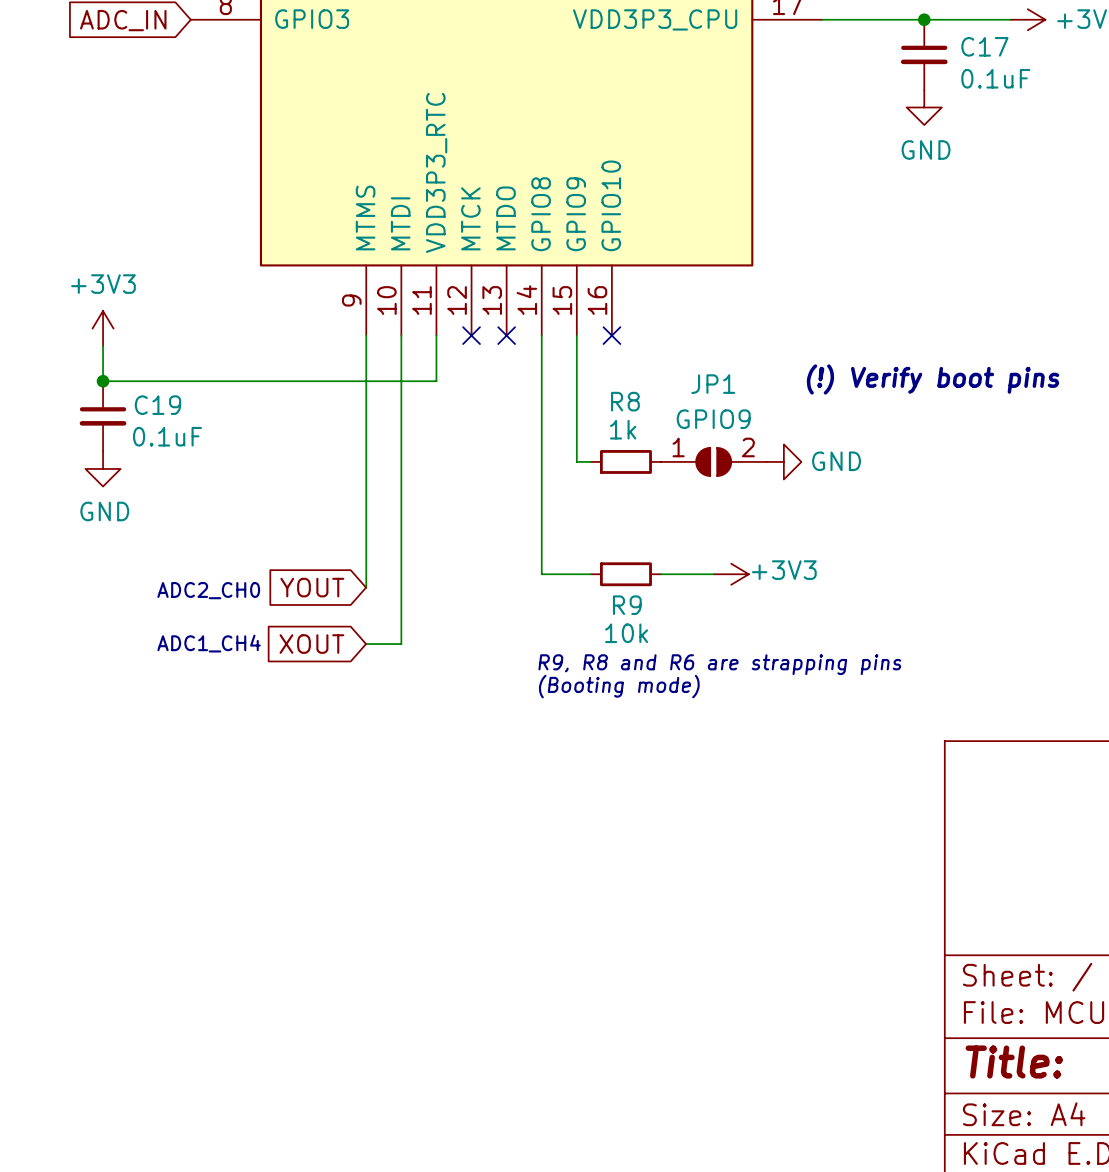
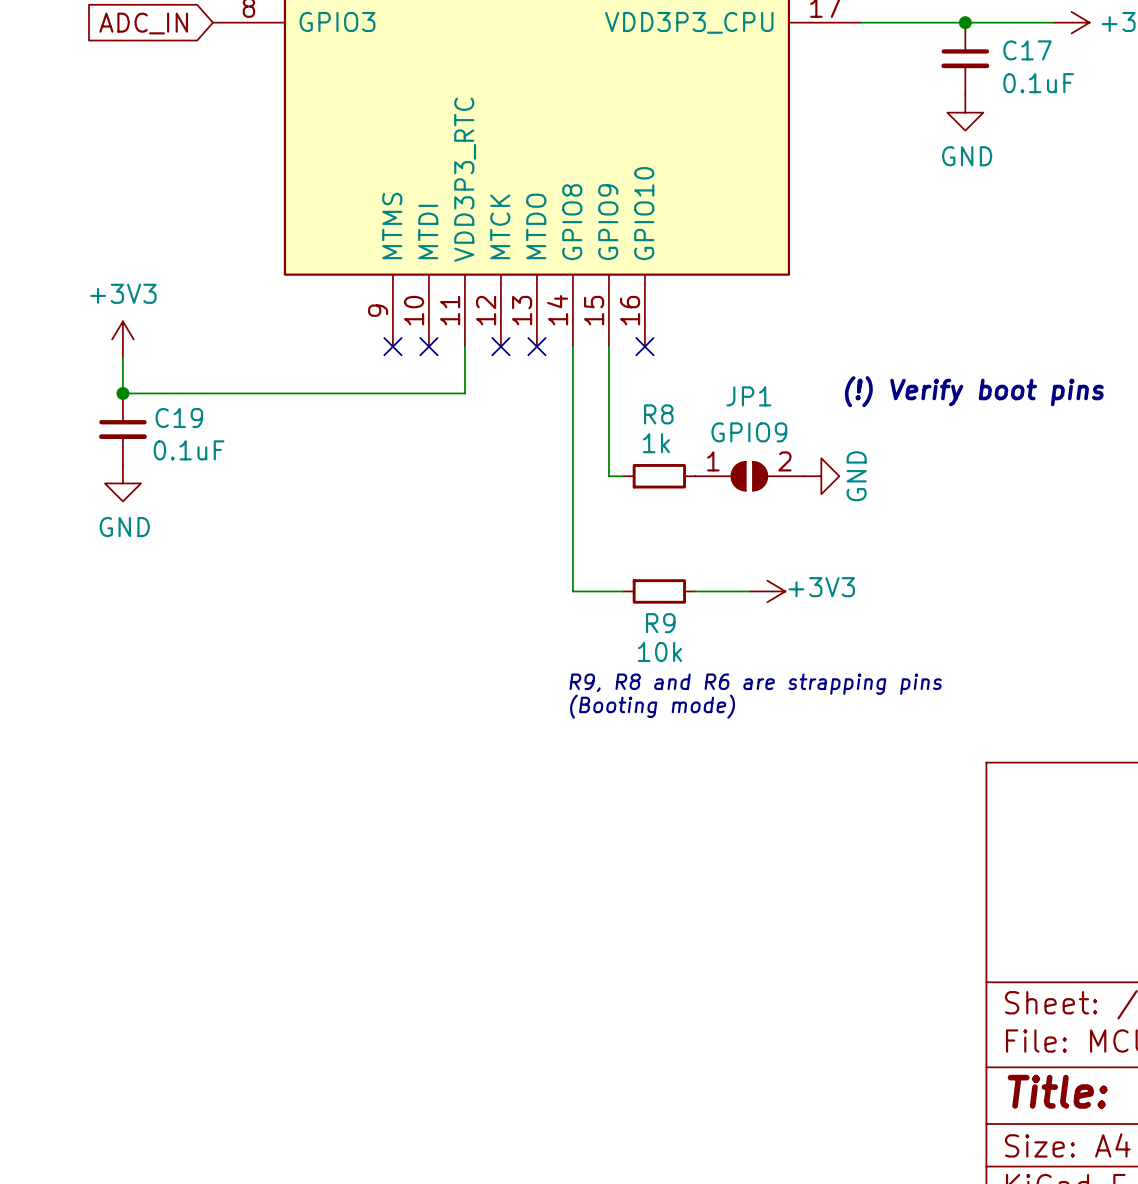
wire: (366, 335) (366, 587) -> none
no-connect mark: none -> (392, 346)
wire: (401, 335) (401, 644) (366, 644) -> none
no-connect mark: none -> (428, 346)
power symbol text rotation: 0° (836, 461) -> 90° counterclockwise (856, 476)
global label: YOUT (312, 587) -> none
text: ADC2_CH0 (208, 590) -> none
text: ADC1_CH4 (209, 643) -> none
global label: XOUT (311, 644) -> none

